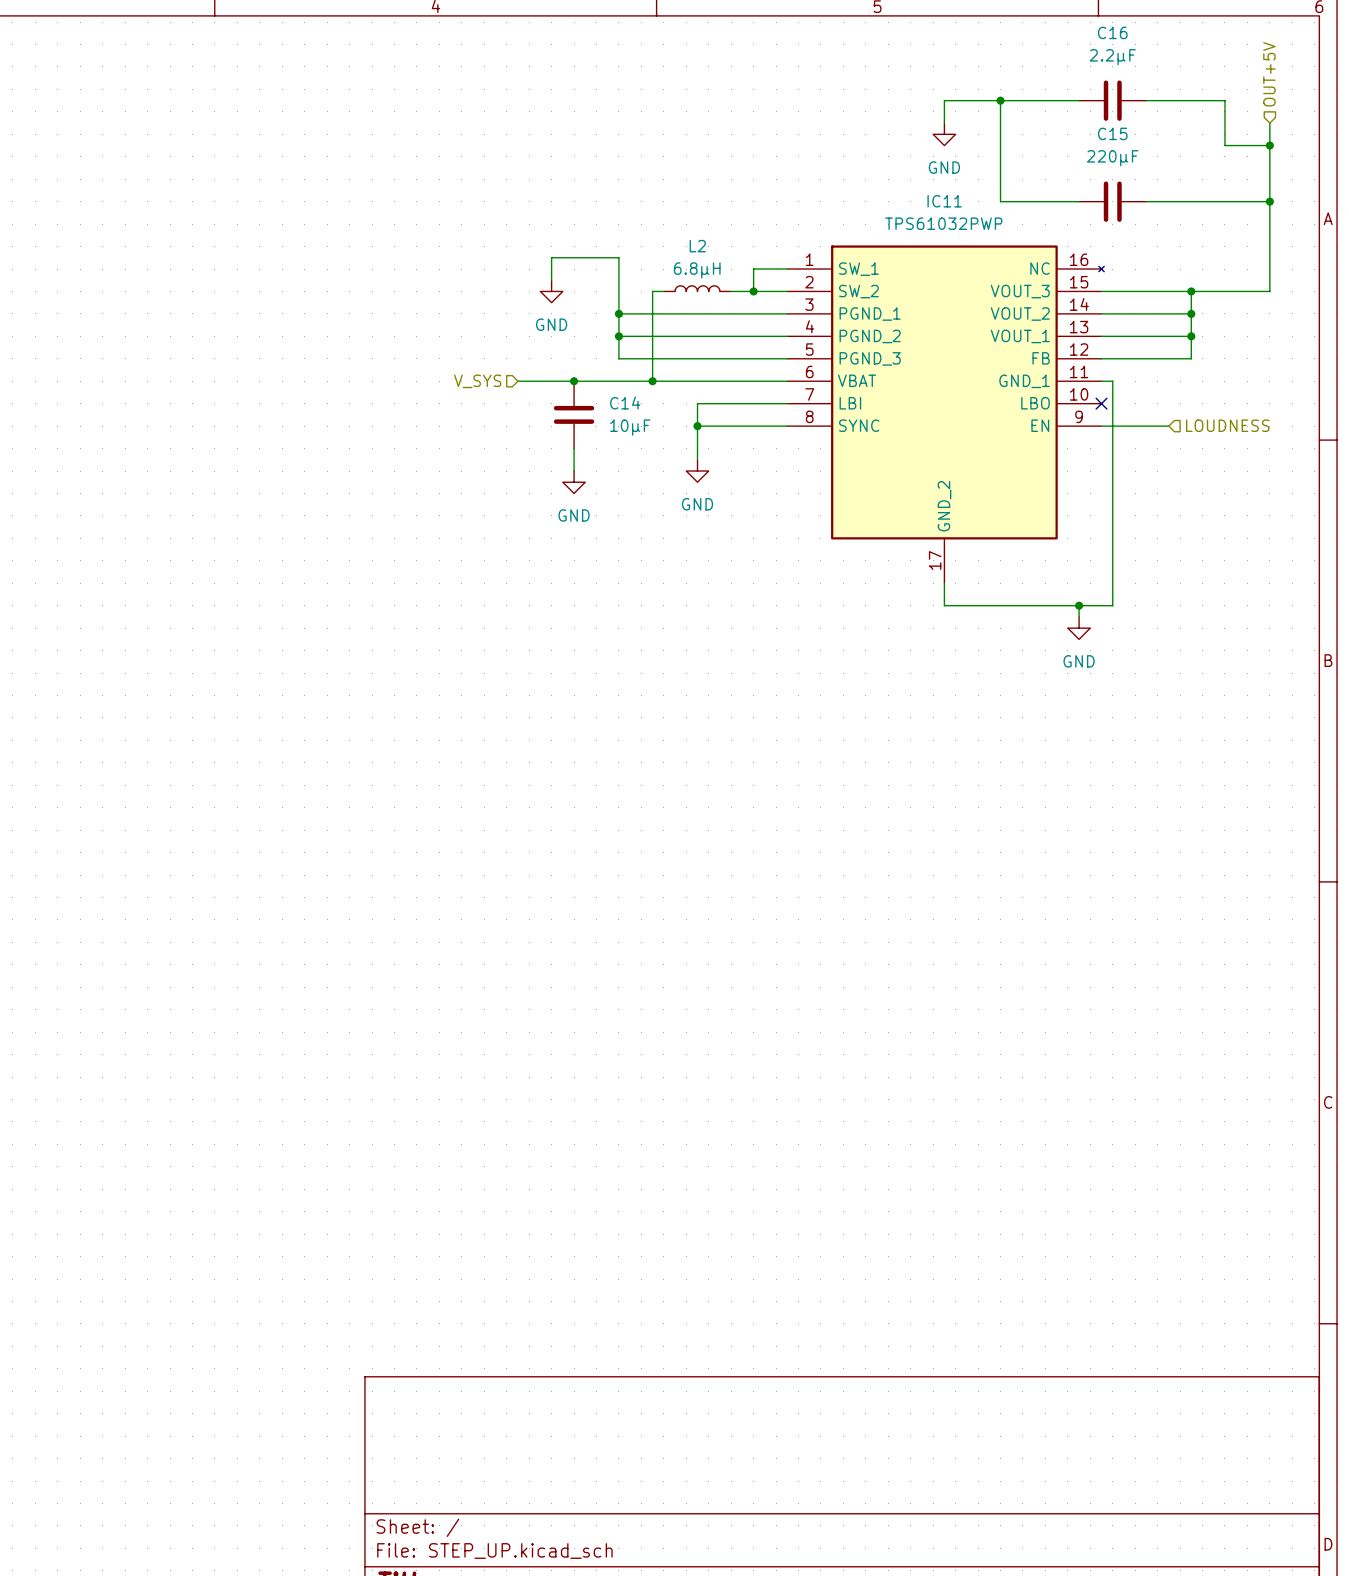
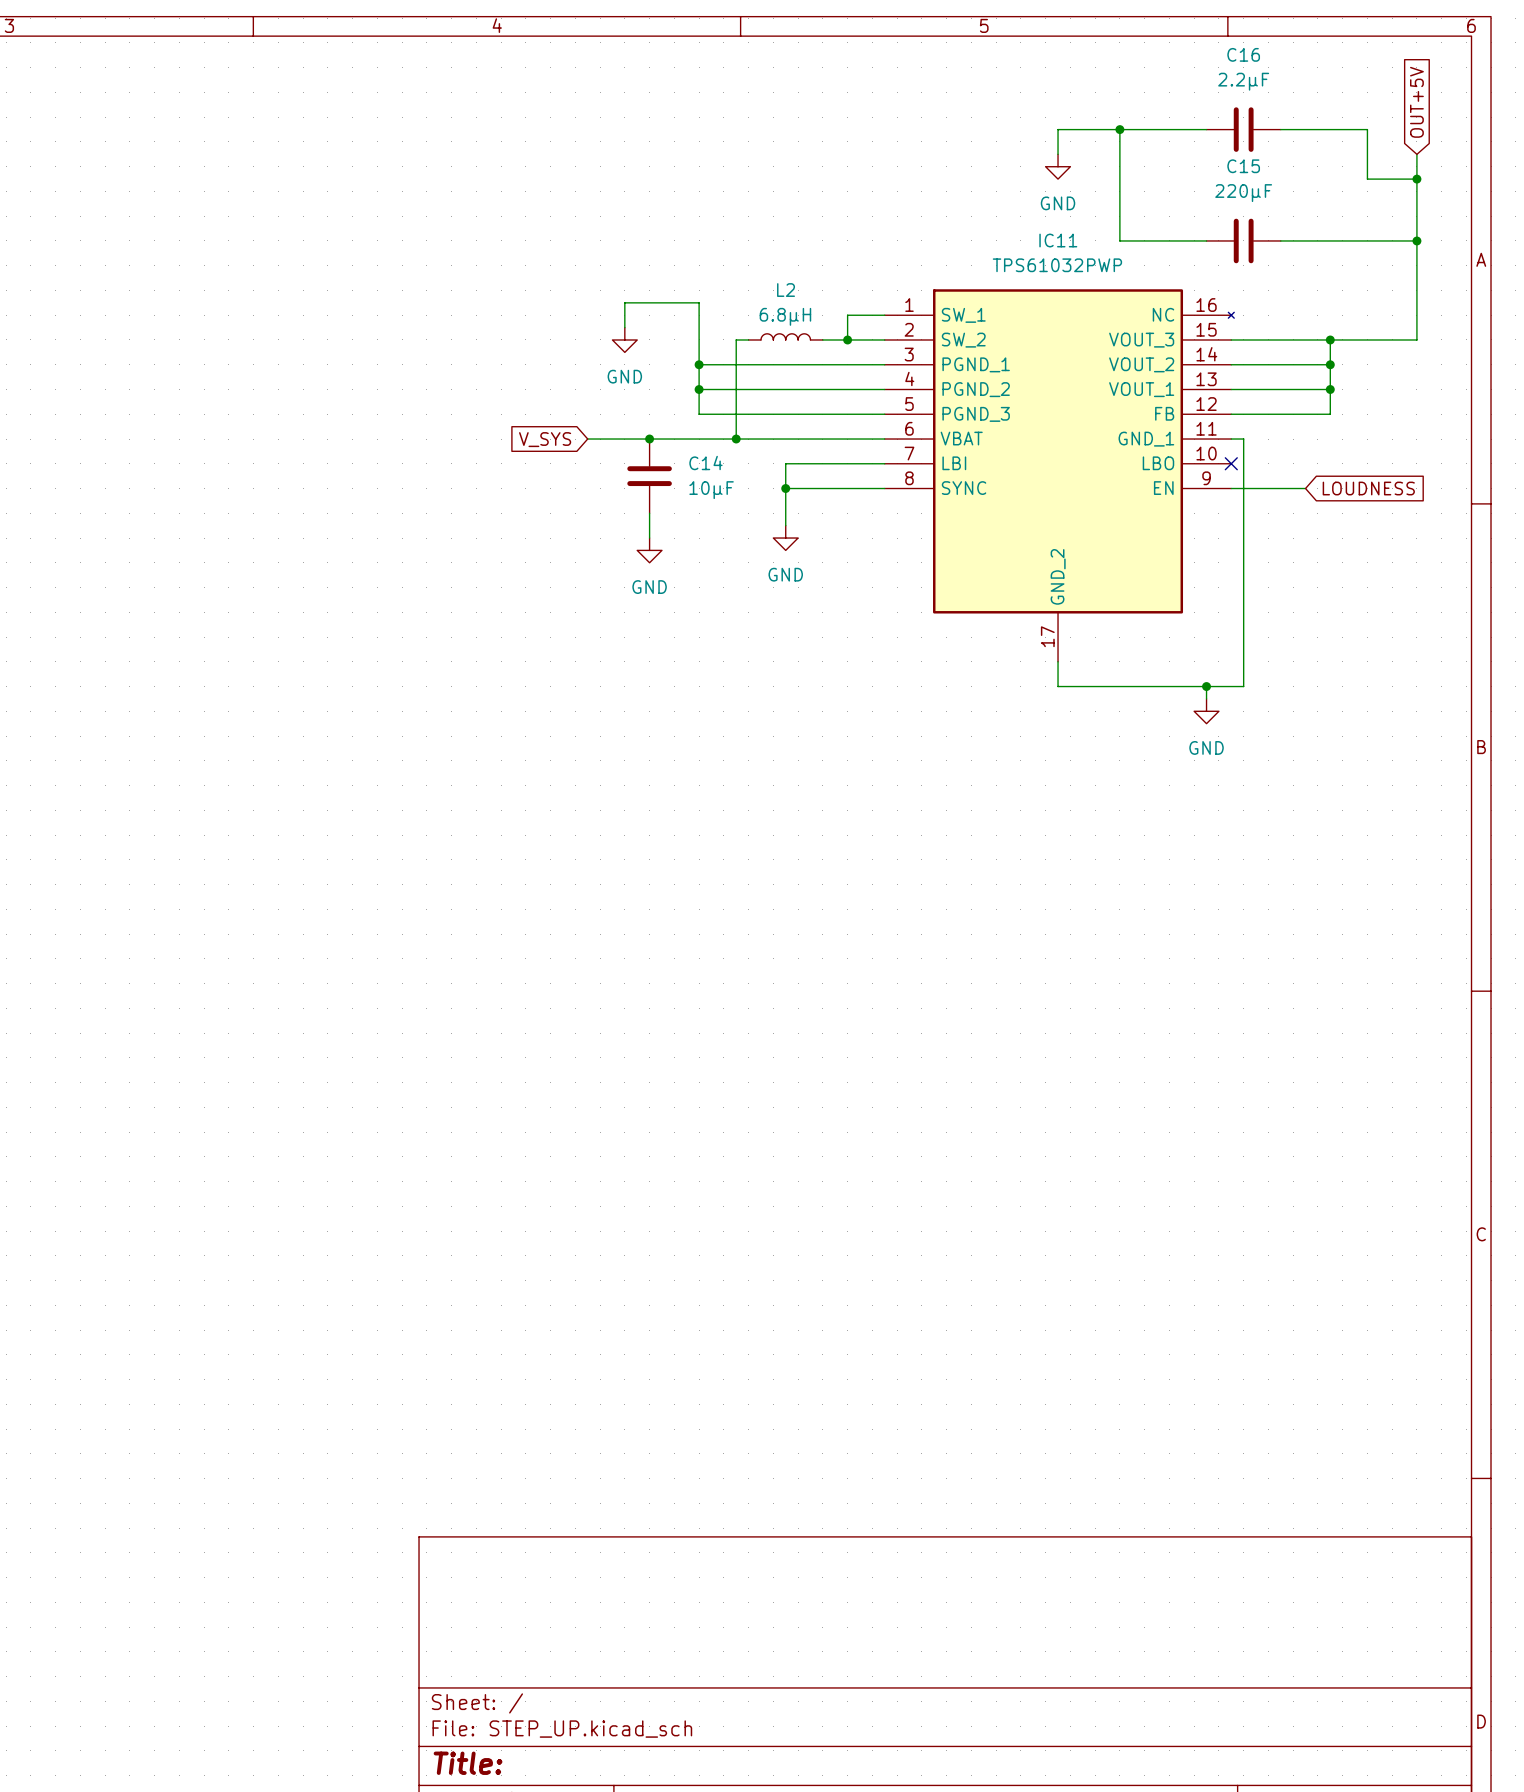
hierarchical label: OUT+5V (1269, 74) -> none
global label: none -> OUT+5V (1416, 102)
hierarchical label: V_SYS (477, 381) -> none
global label: none -> V_SYS (545, 439)
hierarchical label: LOUDNESS (1227, 425) -> none
global label: none -> LOUDNESS (1368, 488)

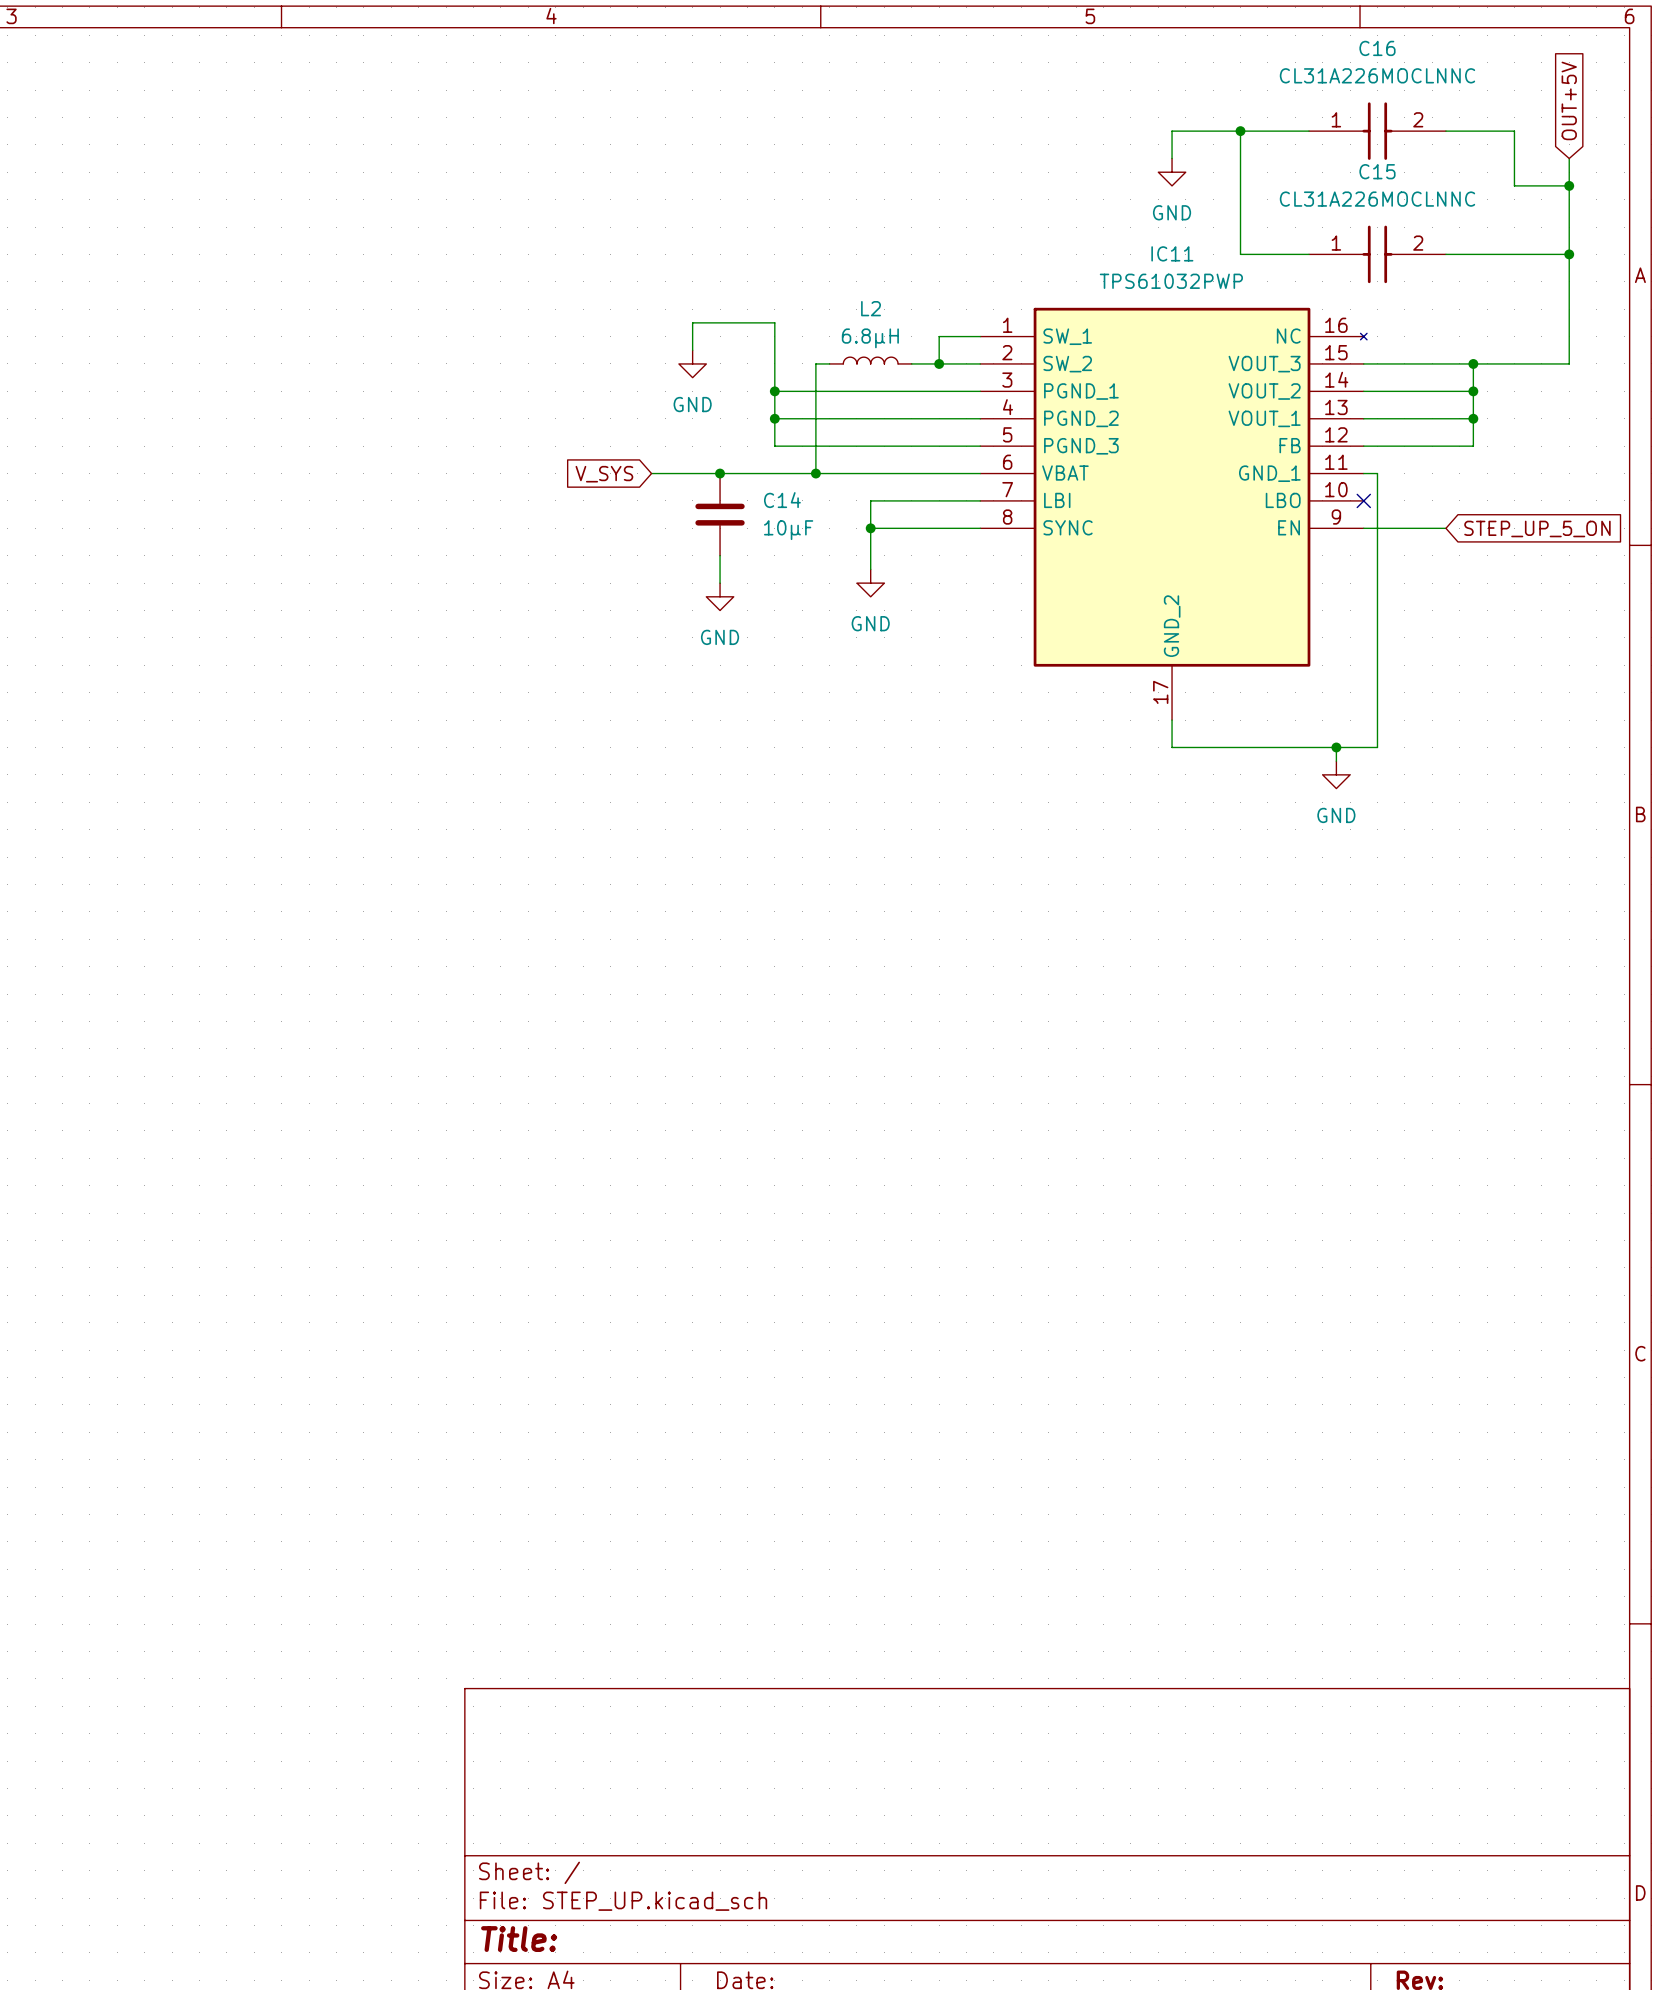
C16 value: 2.2µF (1243, 81) -> CL31A226MOCLNNC (1377, 75)
C16 symbol: [1206, 107, 1281, 152] -> [1308, 102, 1446, 160]
C15 value: 220µF (1243, 193) -> CL31A226MOCLNNC (1377, 199)
C15 symbol: [1206, 218, 1281, 264] -> [1308, 225, 1446, 284]
global label: LOUDNESS (1368, 488) -> STEP_UP_5_ON (1537, 528)

